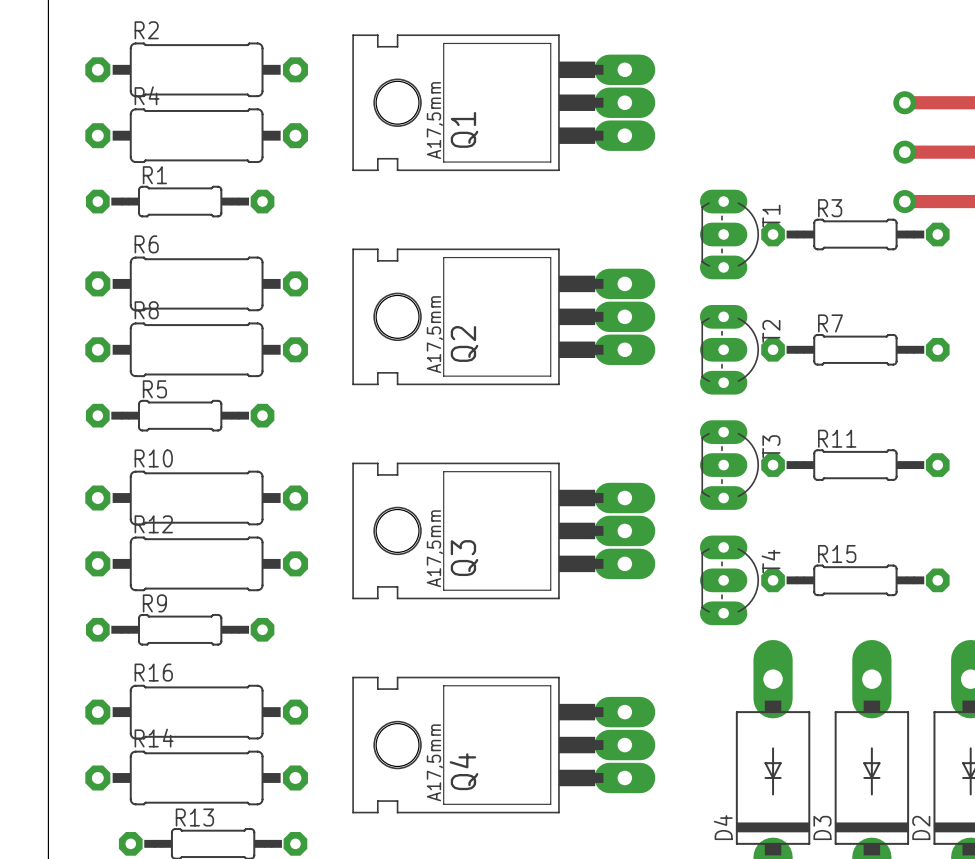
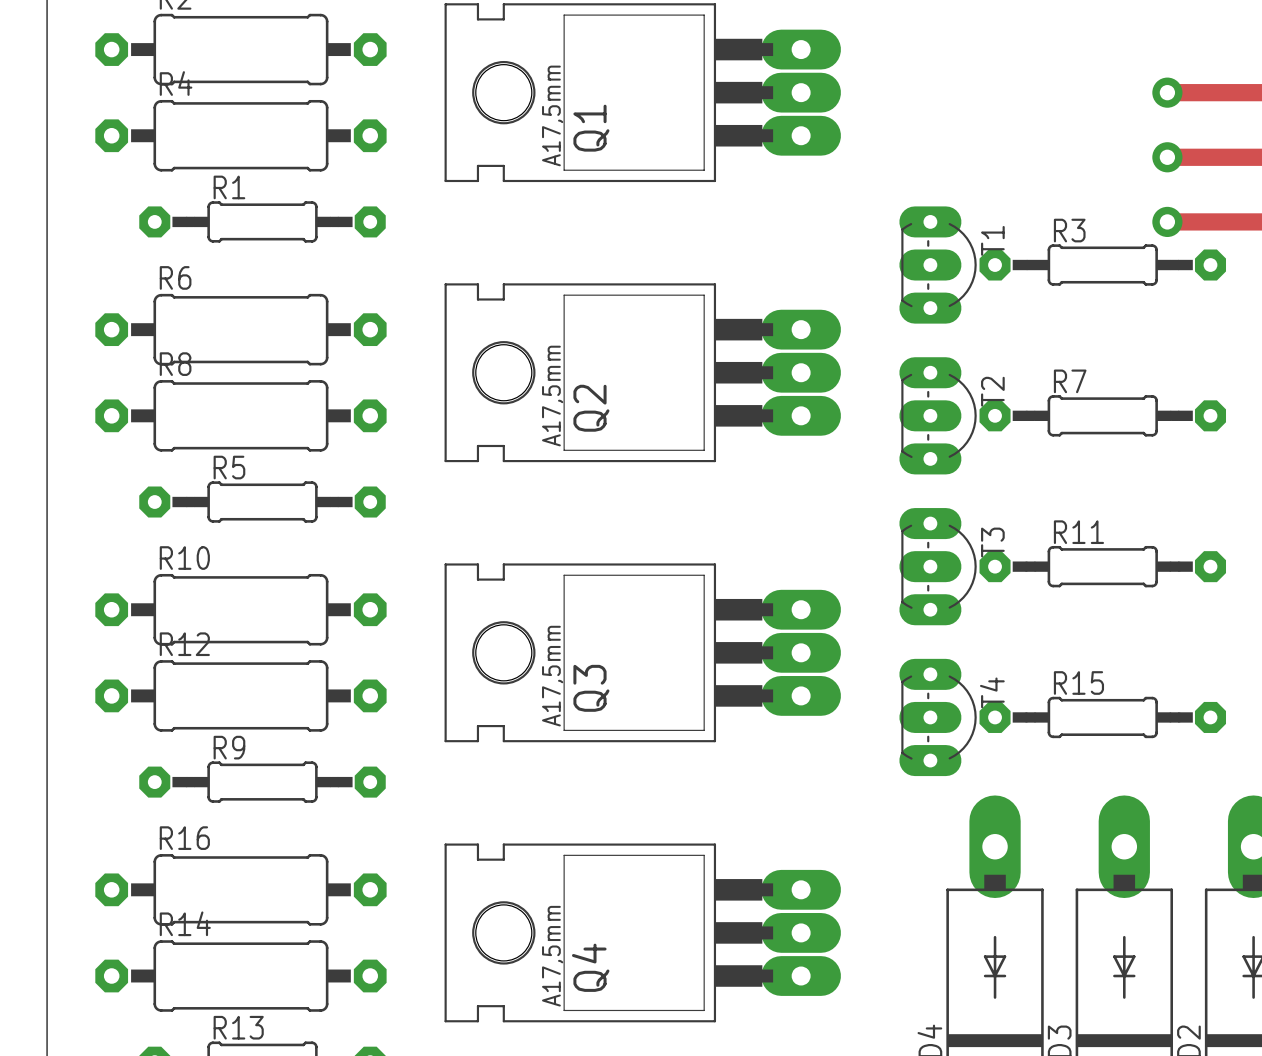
R1 position: (180, 201) -> (262, 221)
R5 position: (180, 415) -> (262, 502)
R9 position: (180, 629) -> (262, 782)

